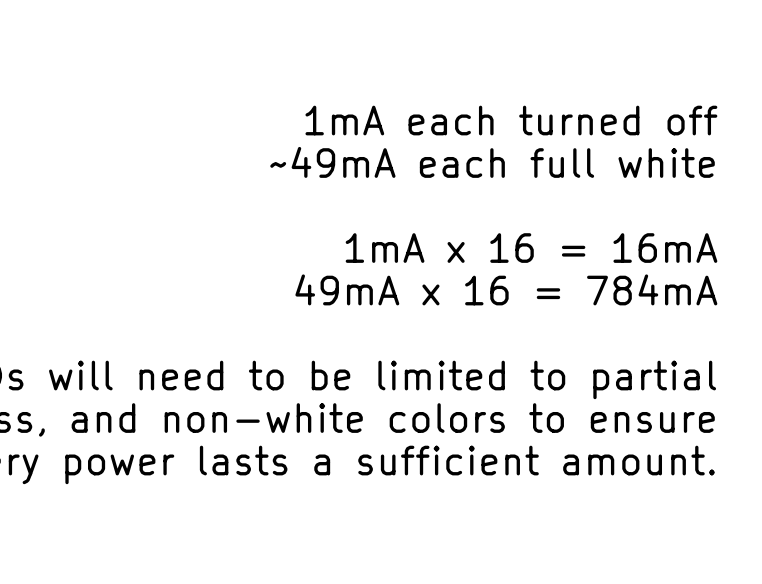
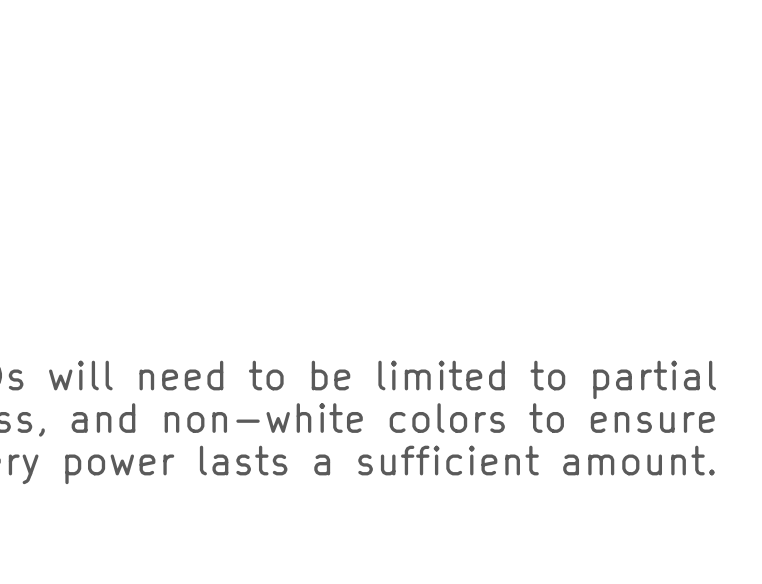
text: 1mA each turned off (511, 120) -> none
text: ~49mA each full white (492, 162) -> none
text: 1mA x 16 = 16mA (531, 248) -> none
text: 49mA x 16 = 784mA (506, 289) -> none

